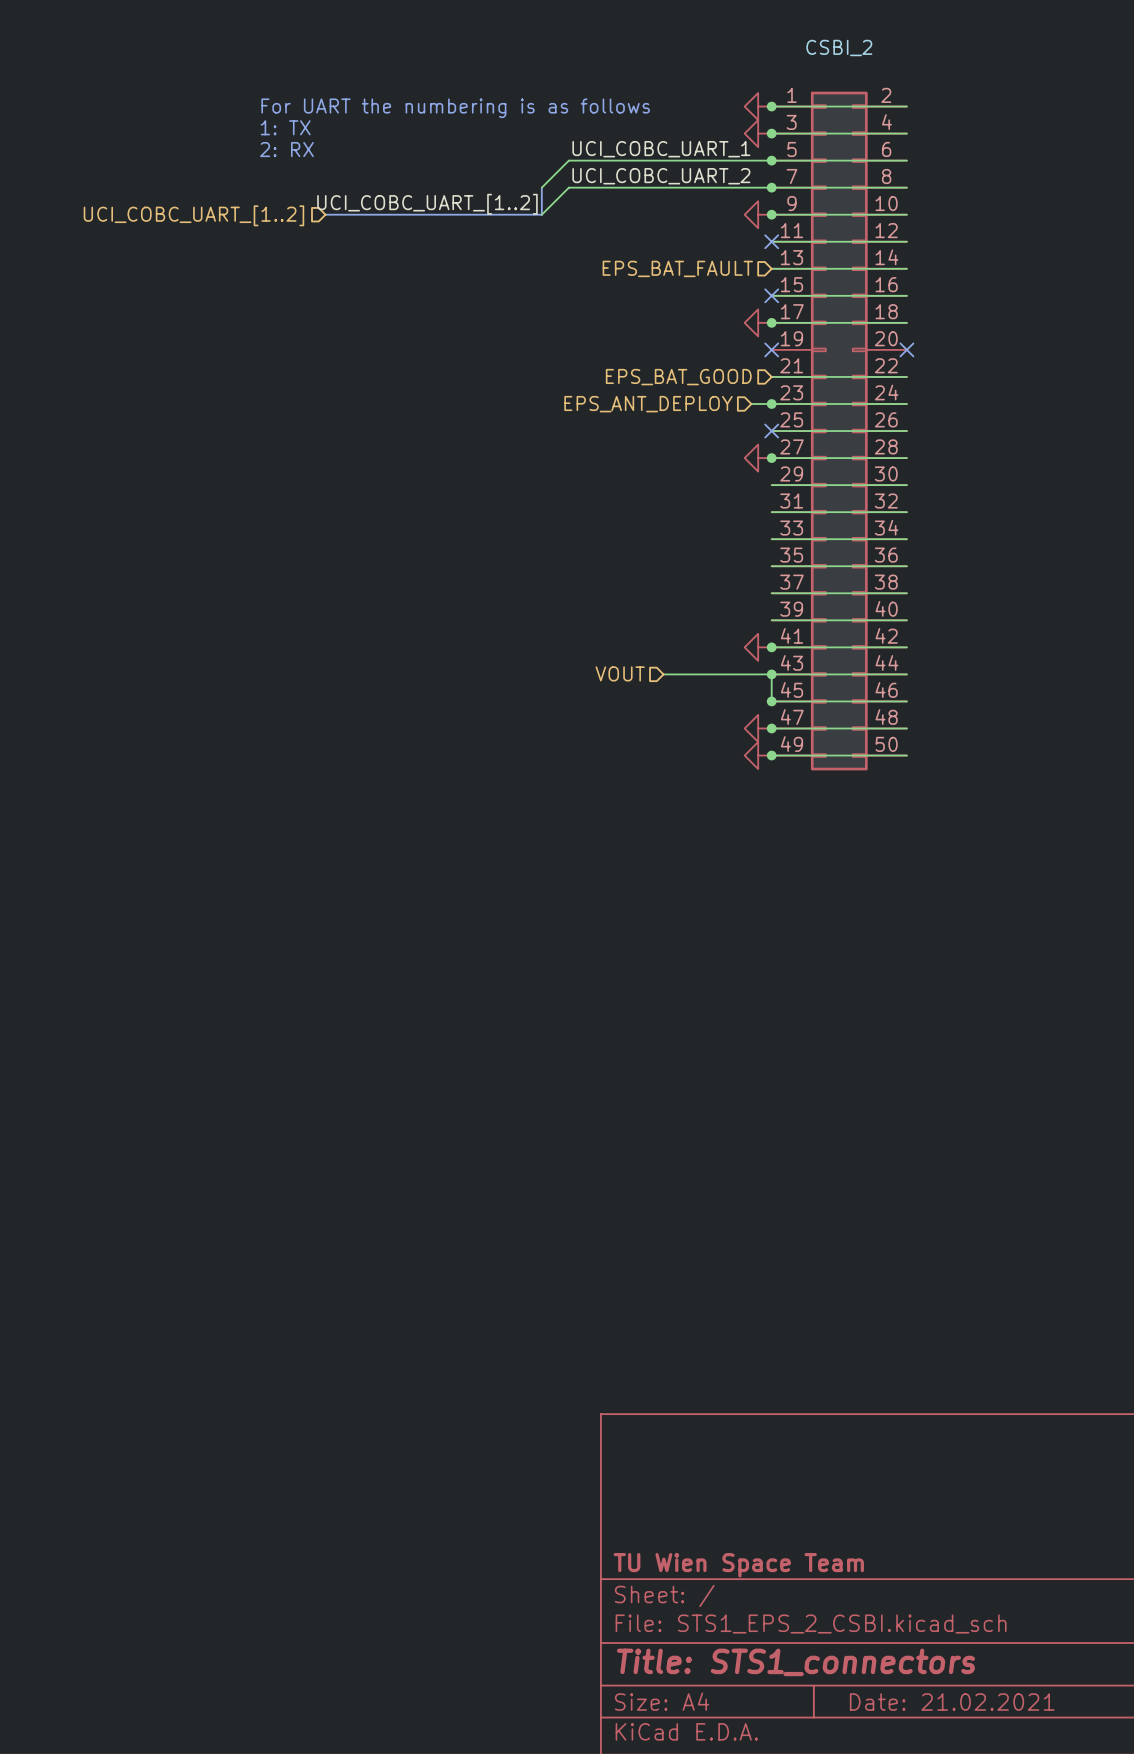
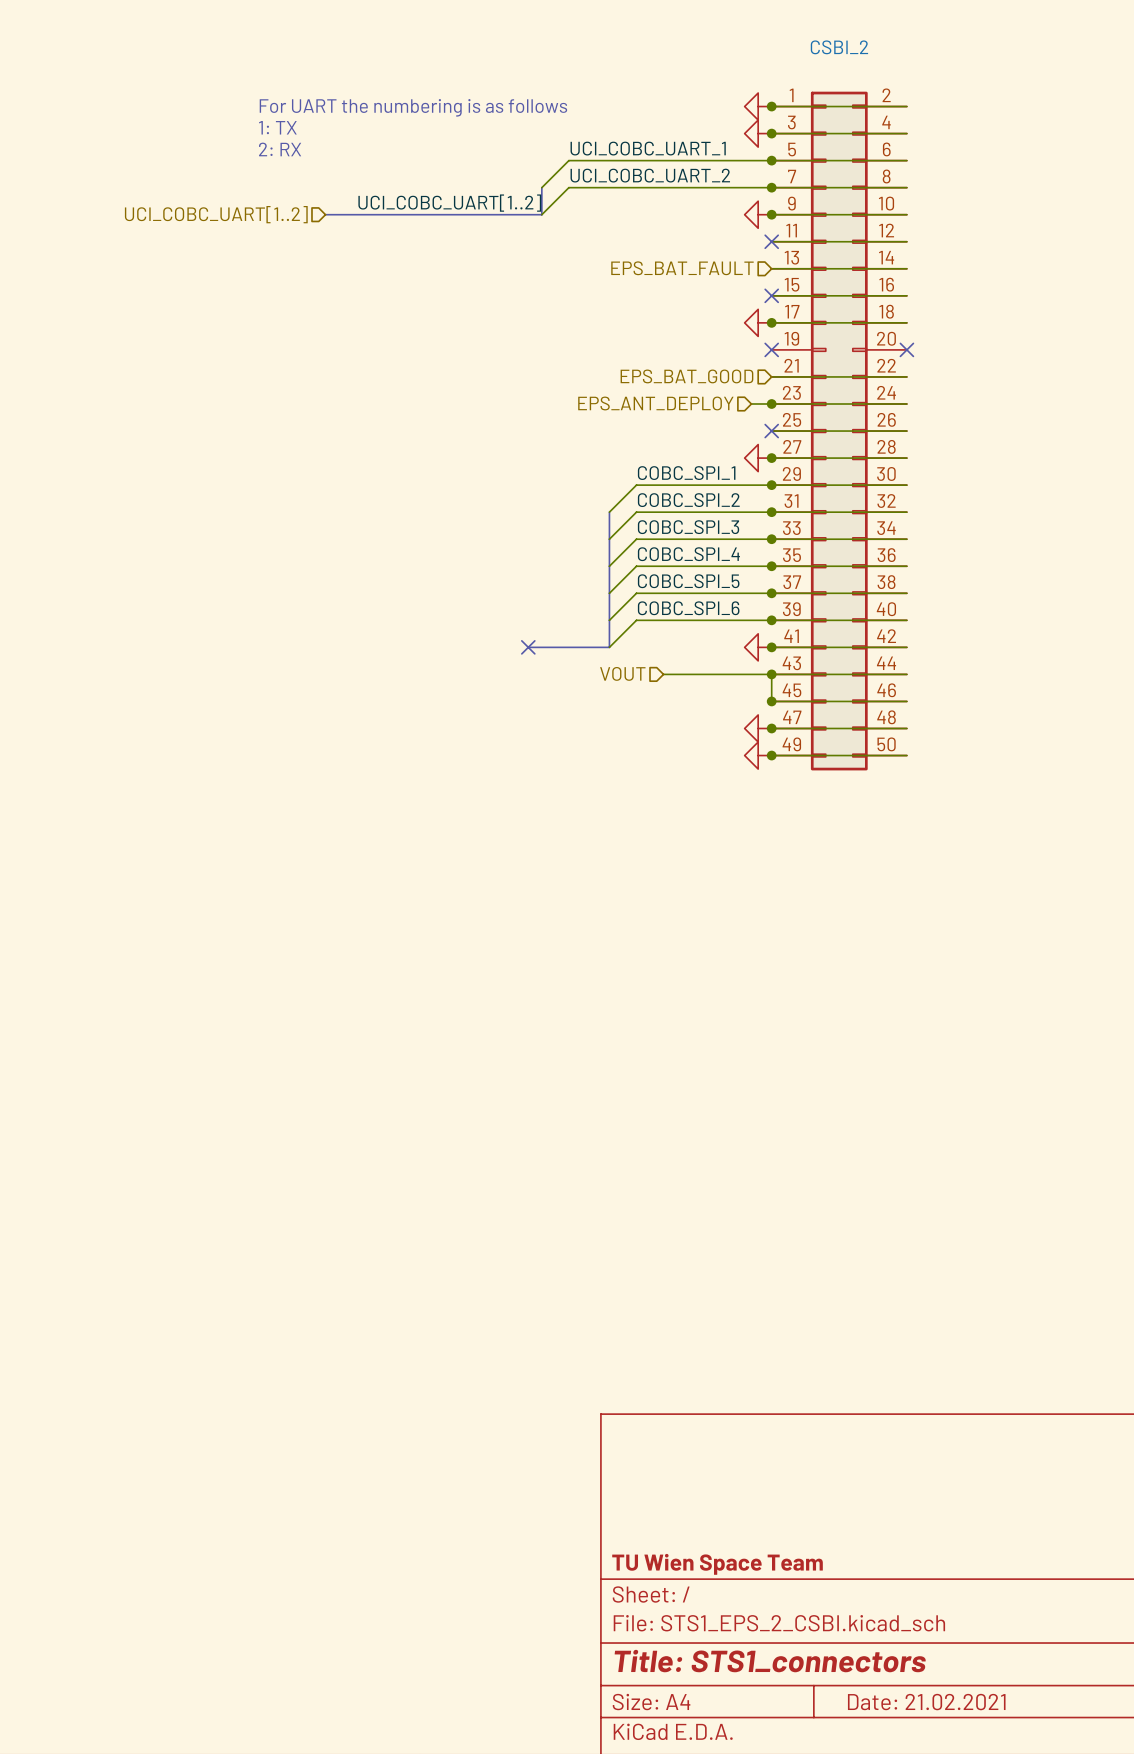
label: UCI_COBC_UART_[1..2] (427, 204) -> UCI_COBC_UART[1..2] (449, 203)
hierarchical label: UCI_COBC_UART_[1..2] (193, 215) -> UCI_COBC_UART[1..2] (216, 214)
label: none -> COBC_SPI_1 (686, 473)
wire: none -> (771, 485) (636, 485) (609, 512)
junction: none -> (771, 485)
label: none -> COBC_SPI_2 (688, 500)
bus: none -> (609, 512) (609, 647) (528, 647)
wire: none -> (771, 512) (636, 512) (609, 539)
junction: none -> (771, 512)
label: none -> COBC_SPI_3 (688, 527)
wire: none -> (771, 539) (636, 539) (609, 566)
junction: none -> (771, 539)
label: none -> COBC_SPI_4 (688, 554)
wire: none -> (771, 566) (636, 566) (609, 593)
junction: none -> (771, 566)
label: none -> COBC_SPI_5 (688, 581)
wire: none -> (771, 593) (636, 593) (609, 620)
junction: none -> (771, 593)
label: none -> COBC_SPI_6 (688, 608)
wire: none -> (771, 620) (636, 620) (609, 647)
junction: none -> (771, 620)
no-connect mark: none -> (528, 647)

